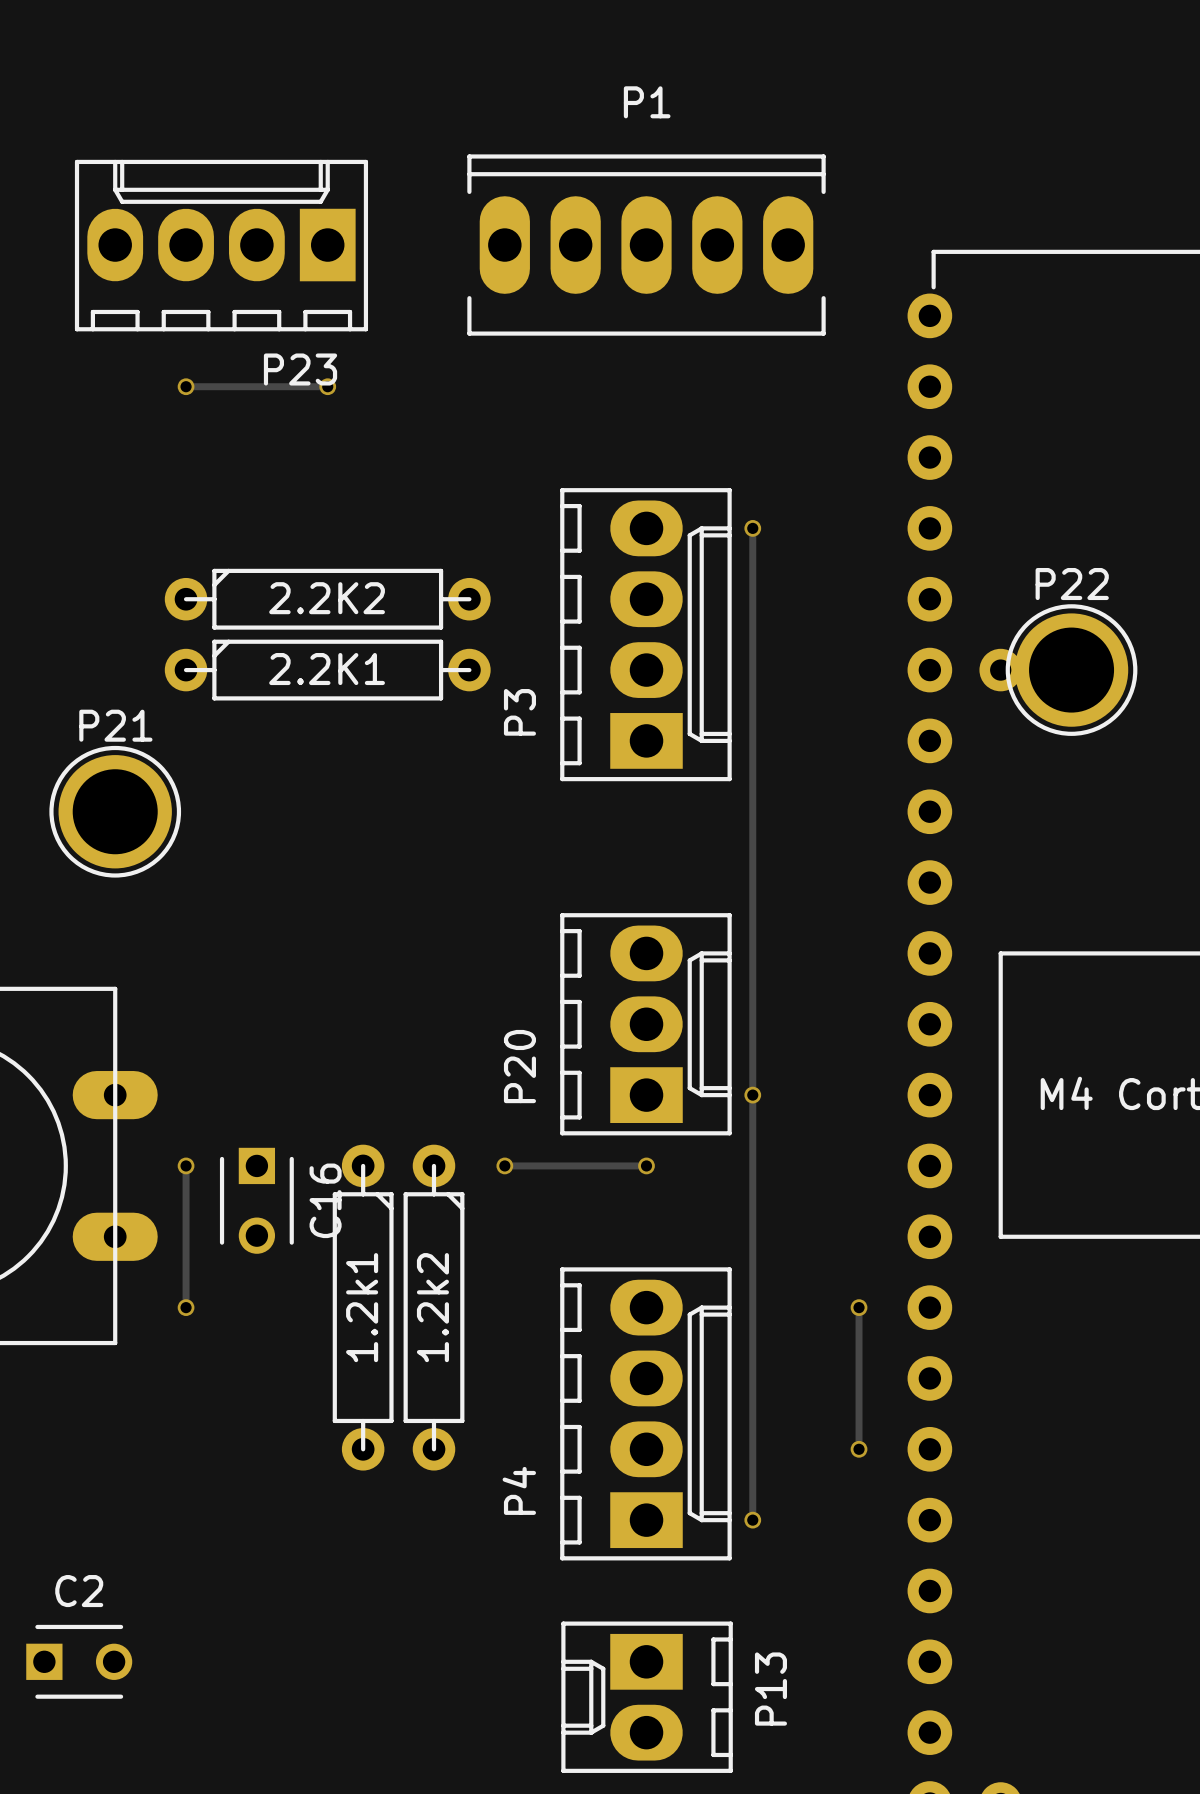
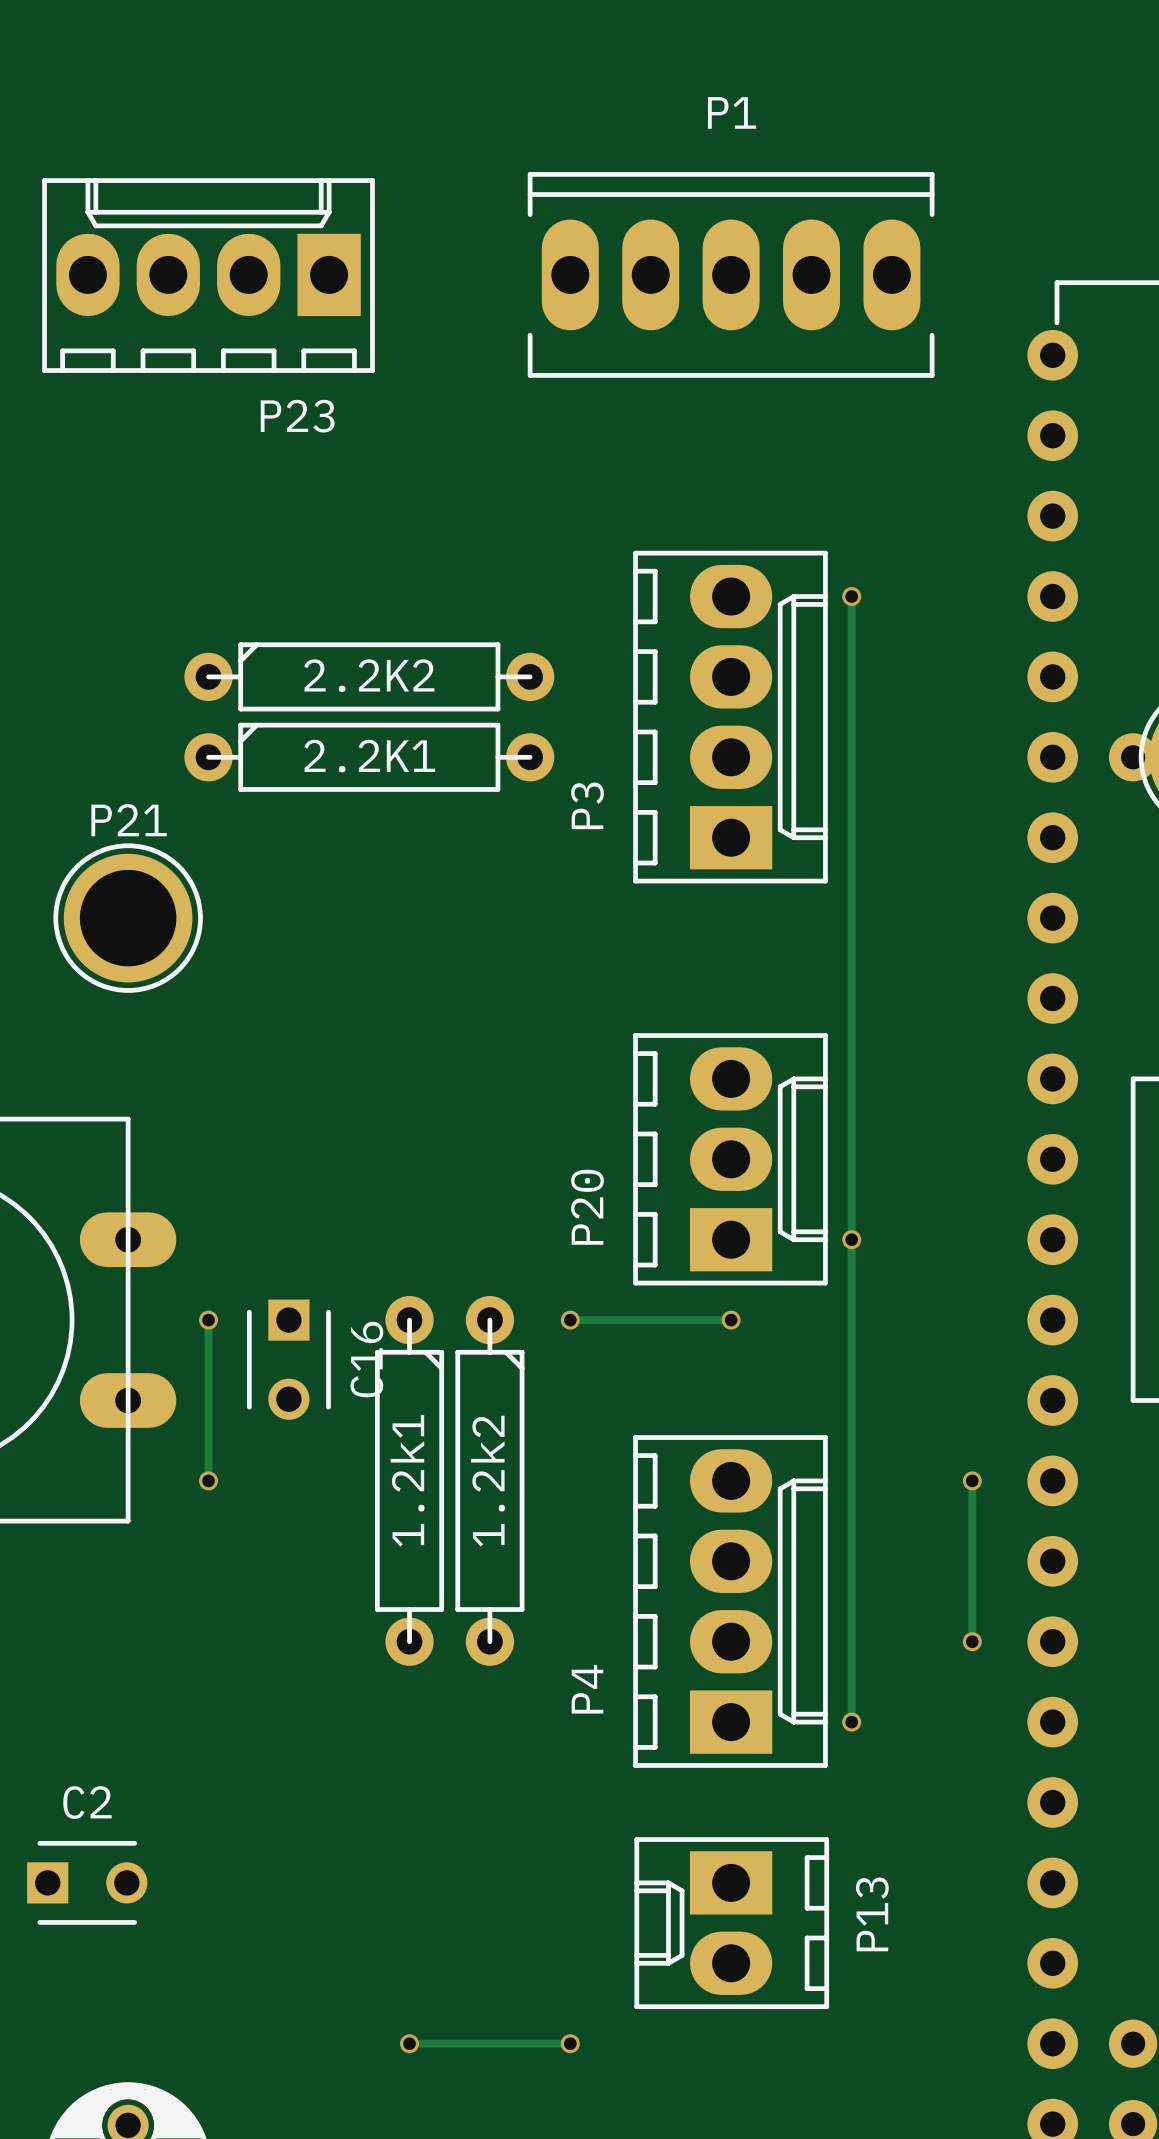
P23 position: (221, 245) -> (208, 275)
track: (186, 386) (327, 386) -> none
via: (186, 386) -> none
via: (327, 386) -> none

